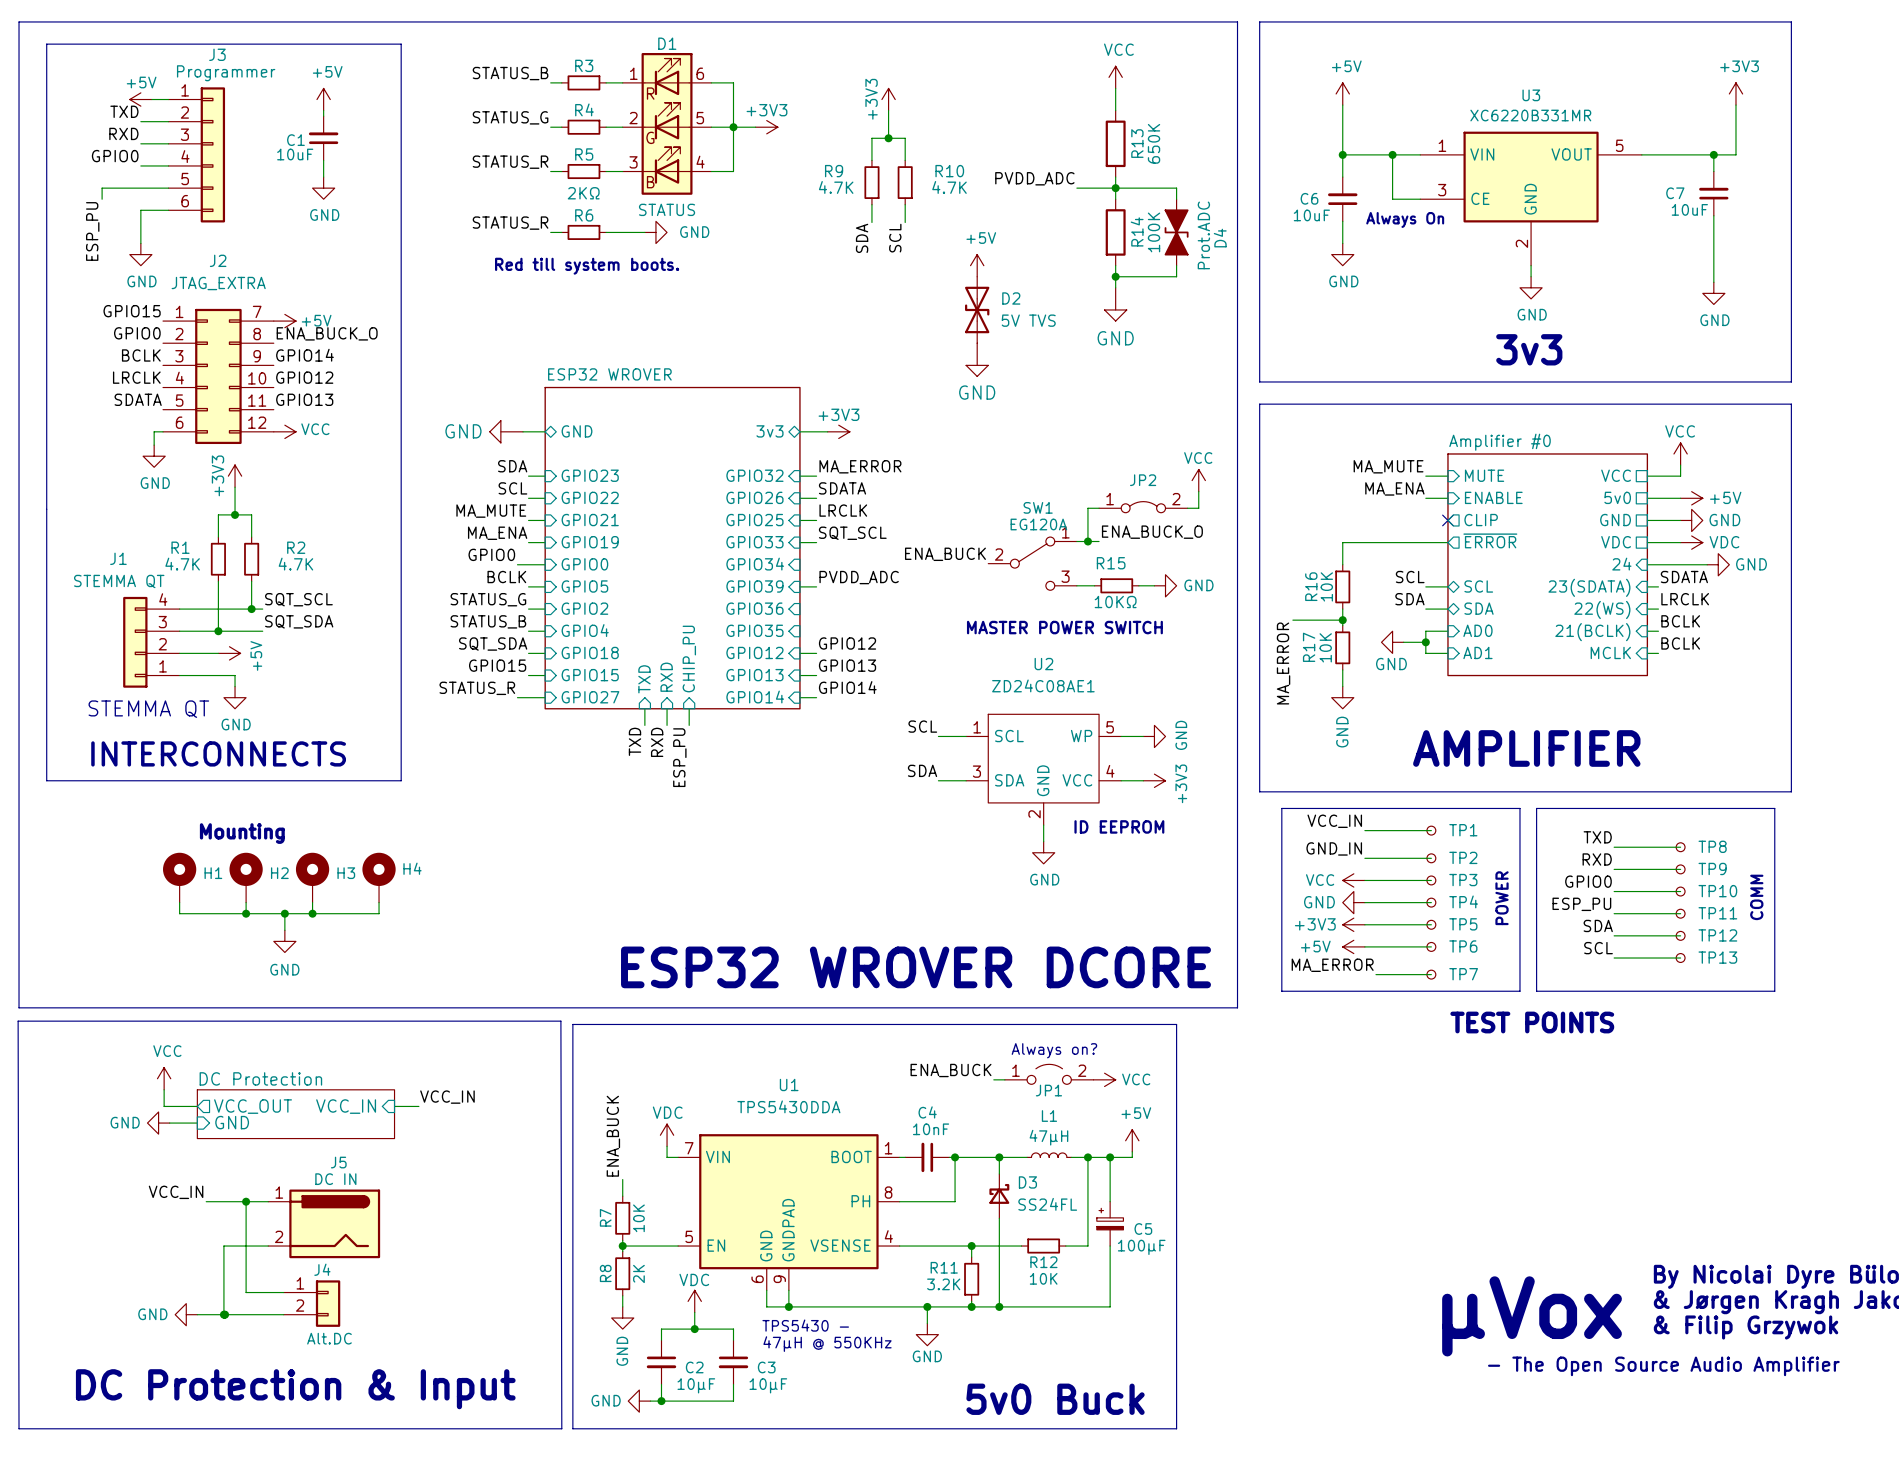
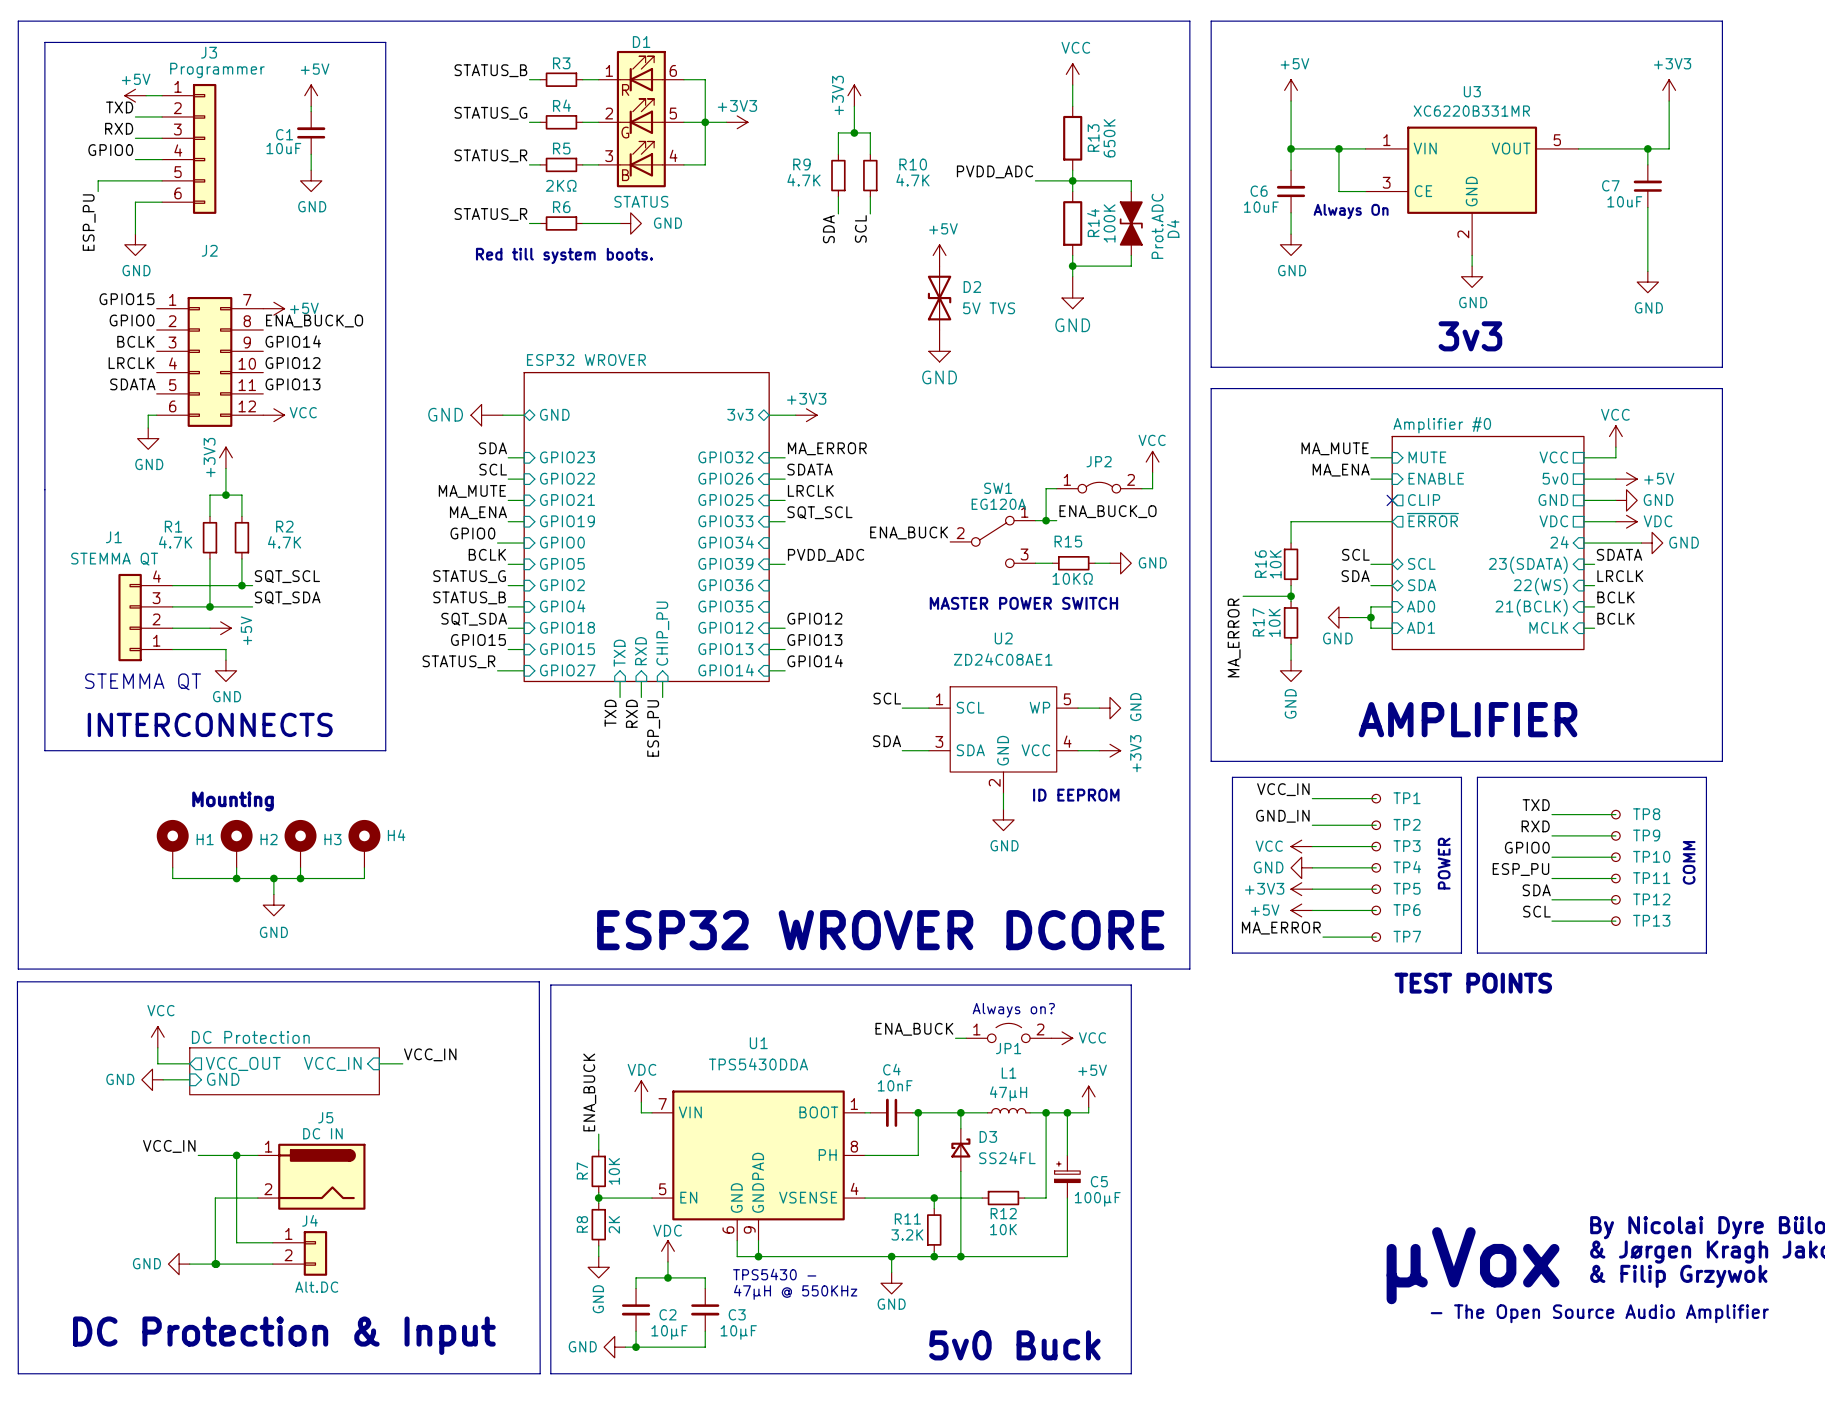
J2 value: JTAG_EXTRA (218, 283) -> none

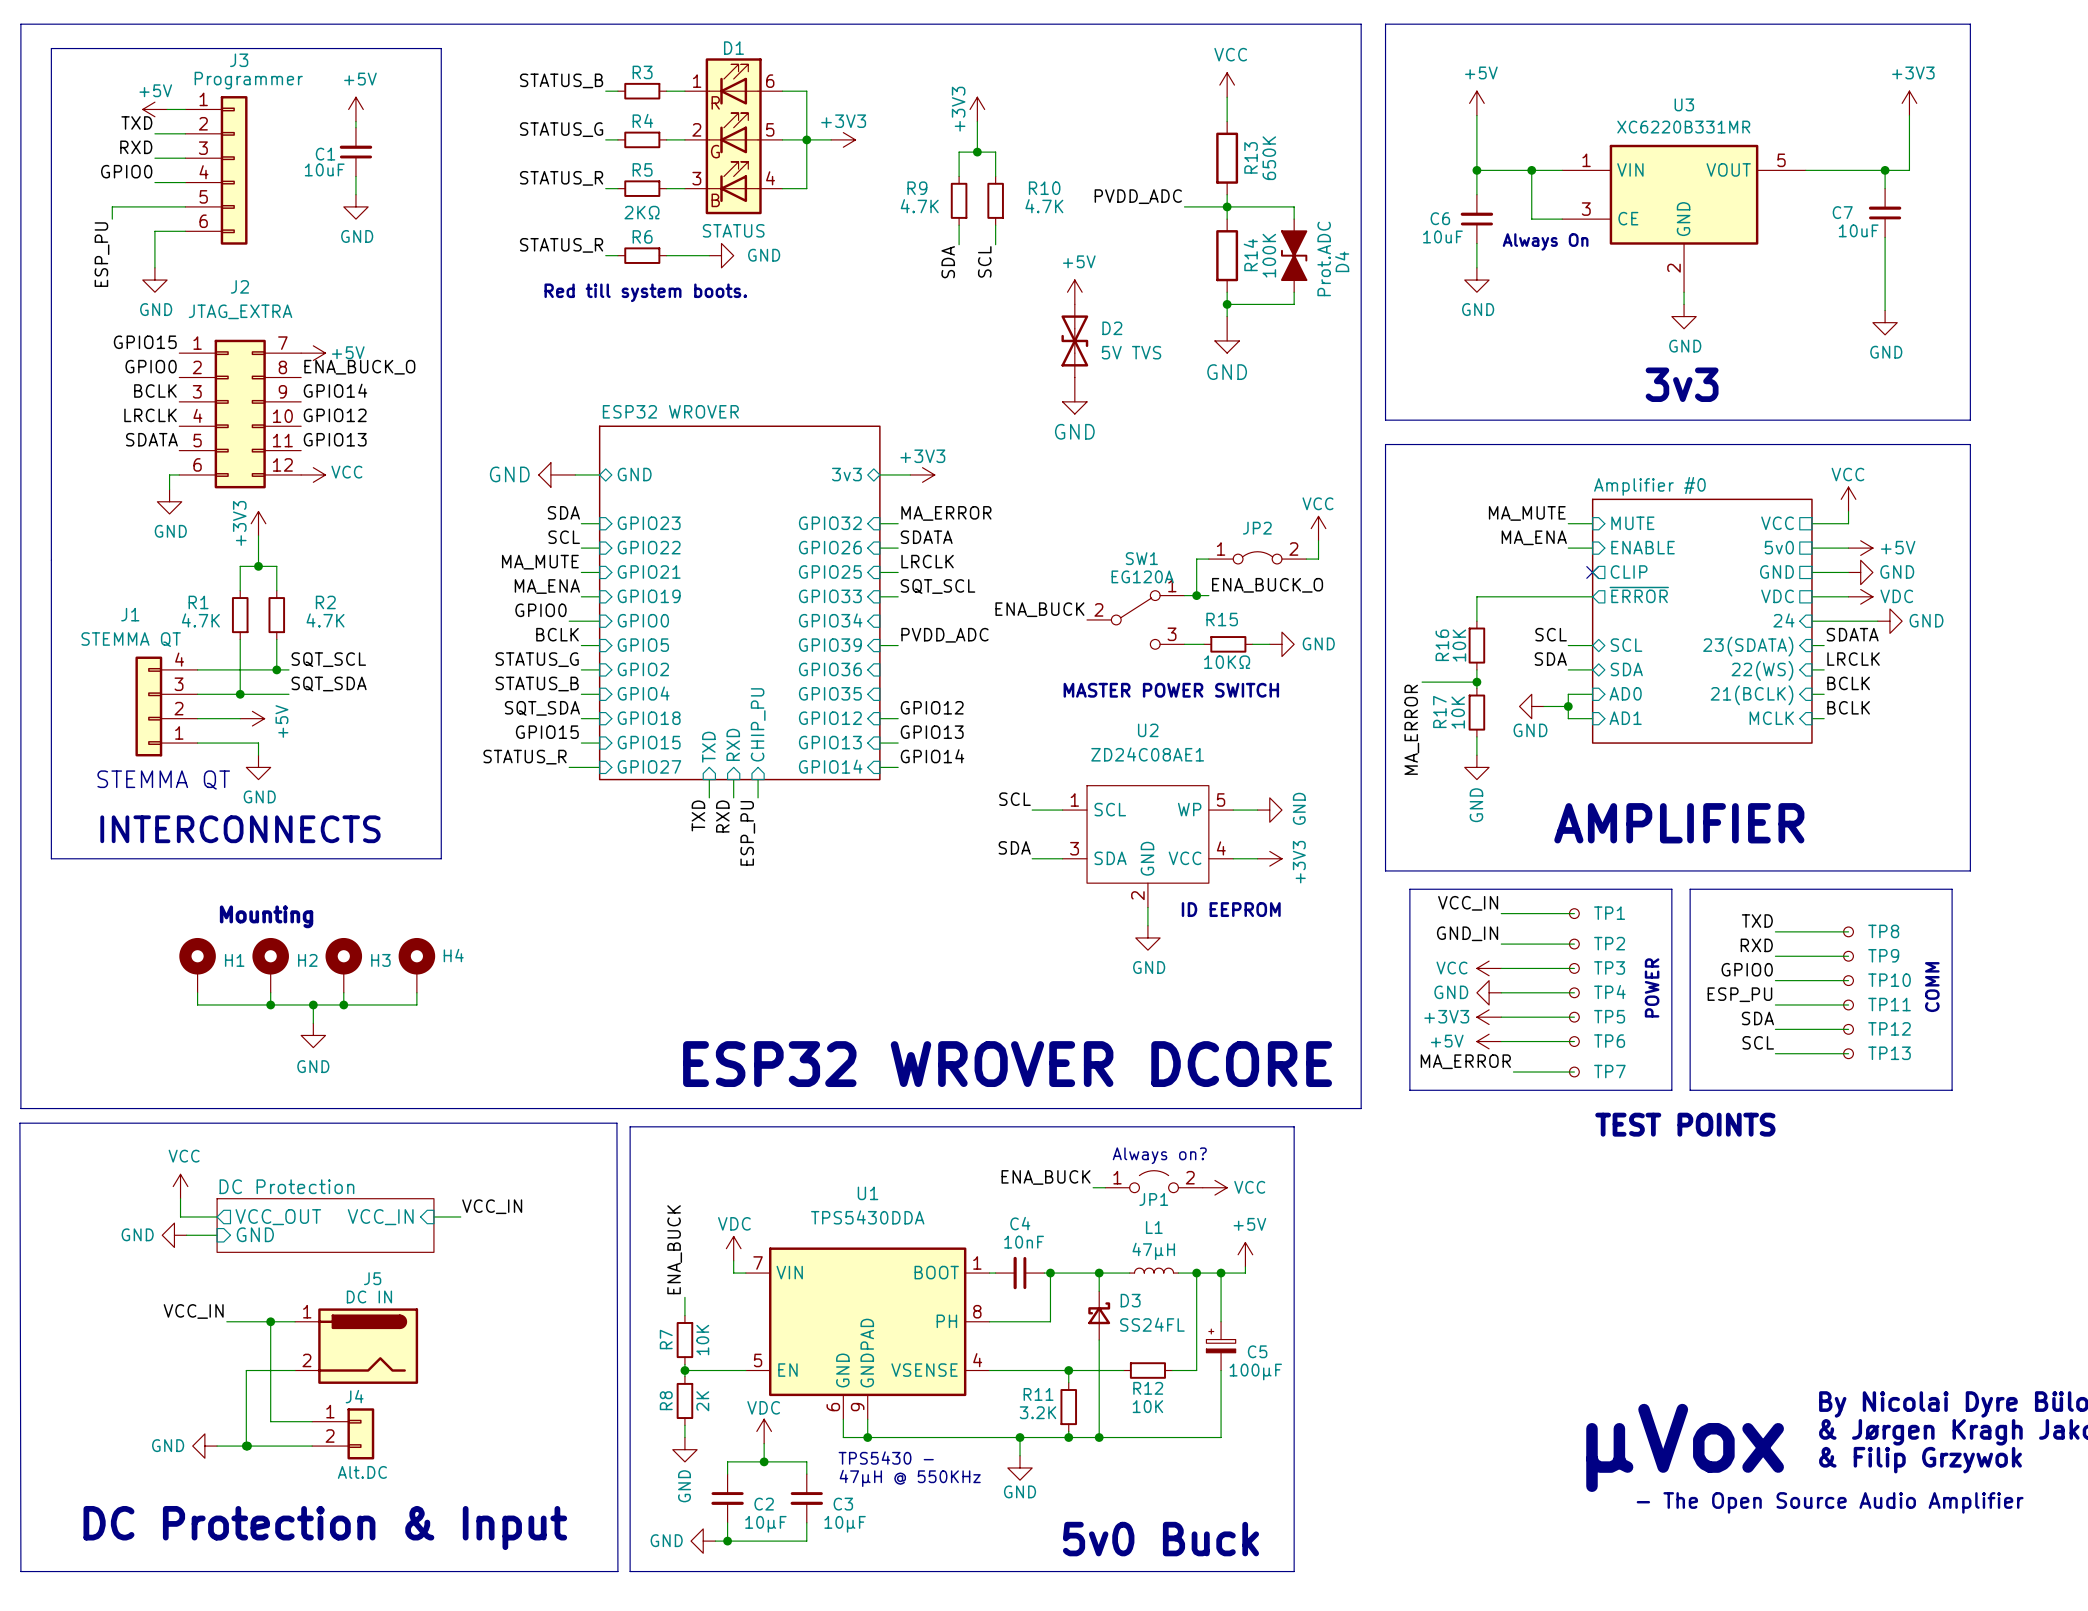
J2 value: none -> JTAG_EXTRA (240, 311)

